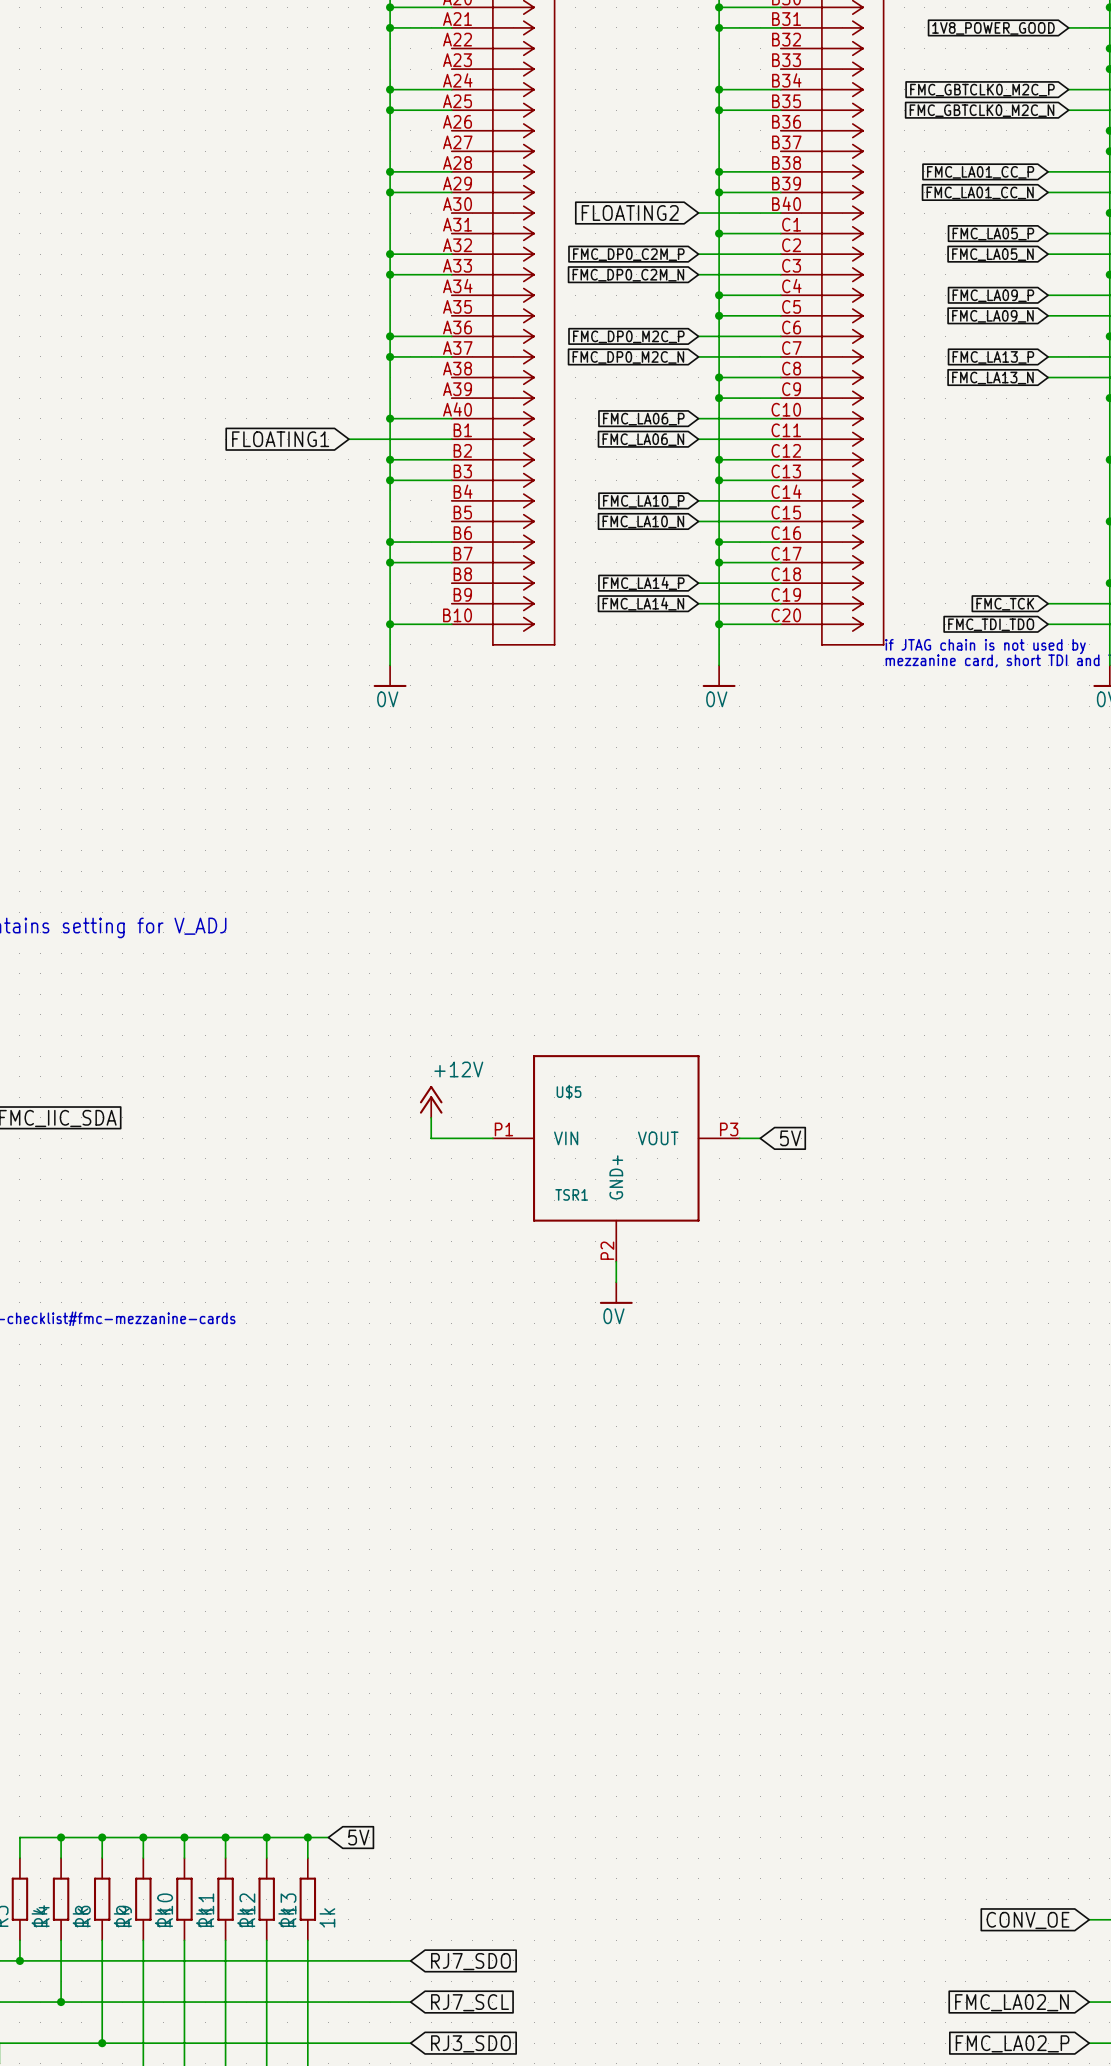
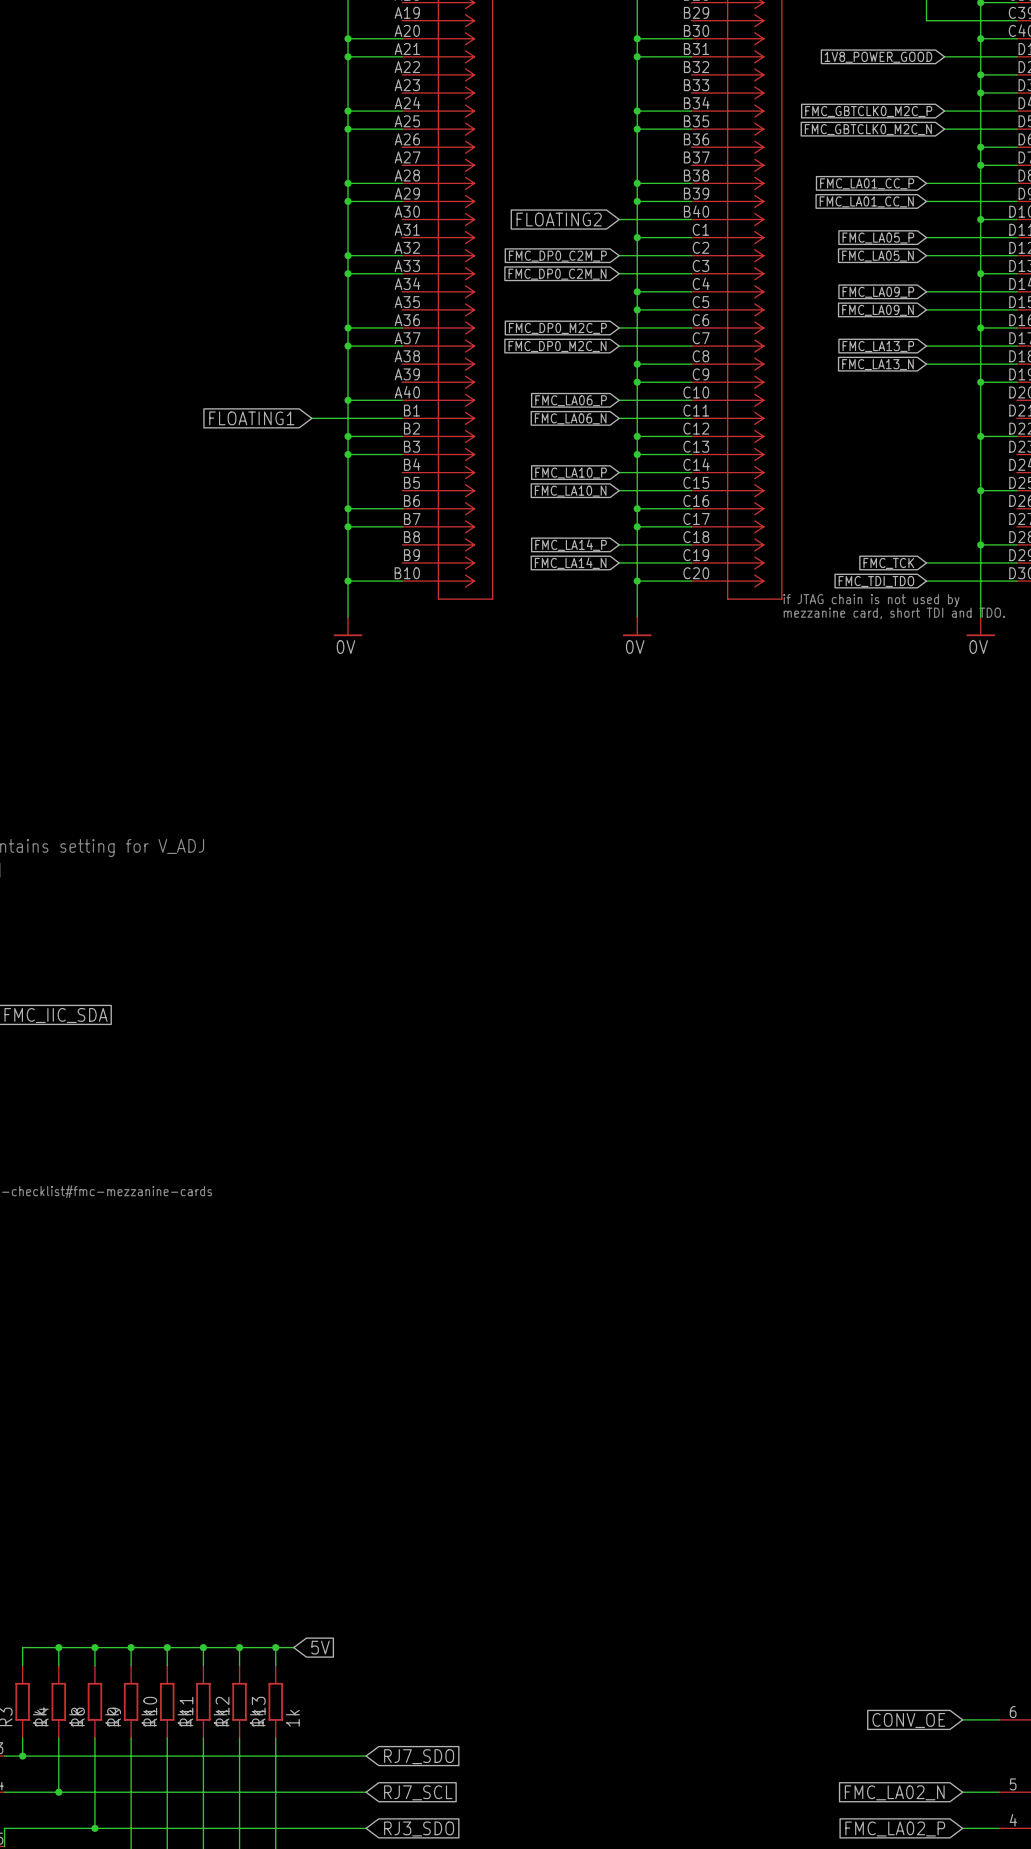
power symbol: +12V (431, 1101) -> none
wire: (431, 1117) (431, 1138) (492, 1138) -> none
wire: (739, 1138) (760, 1138) -> none
global label: 5V (790, 1138) -> none
U$5: TSR1 (616, 1158) -> none
wire: (616, 1261) (616, 1282) -> none
power symbol: 0V (616, 1293) -> none

